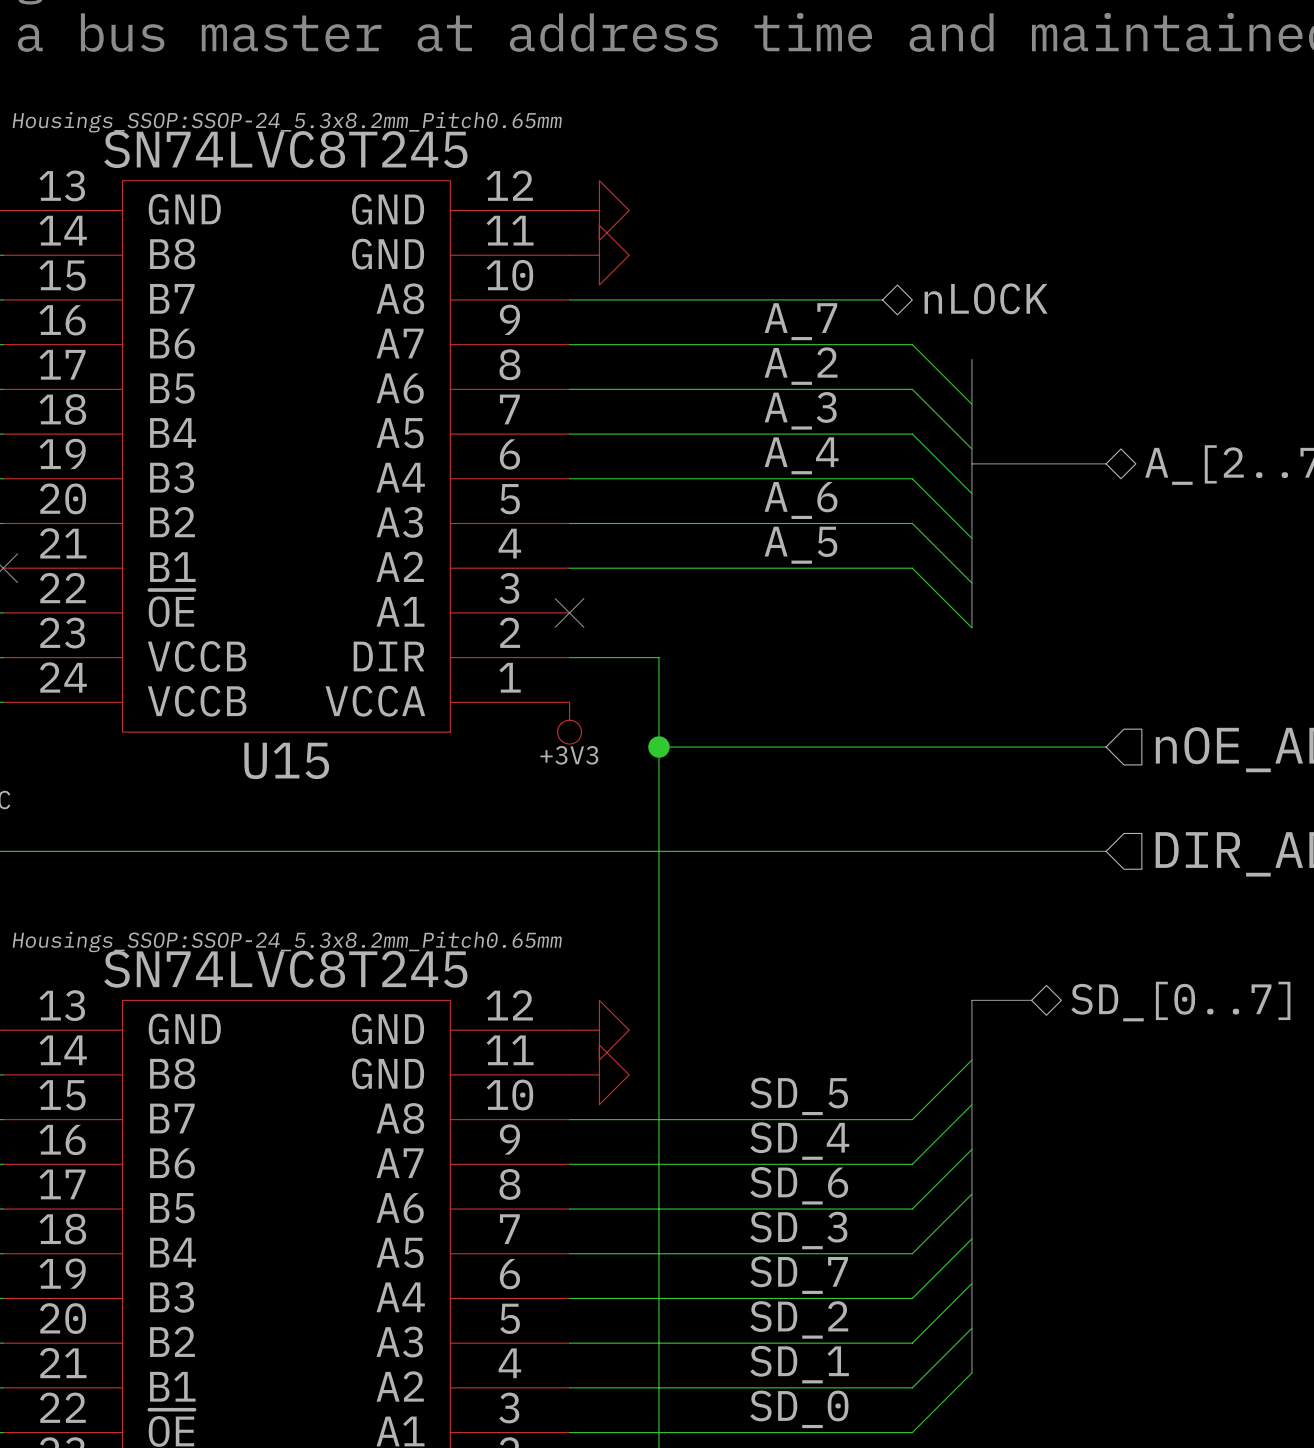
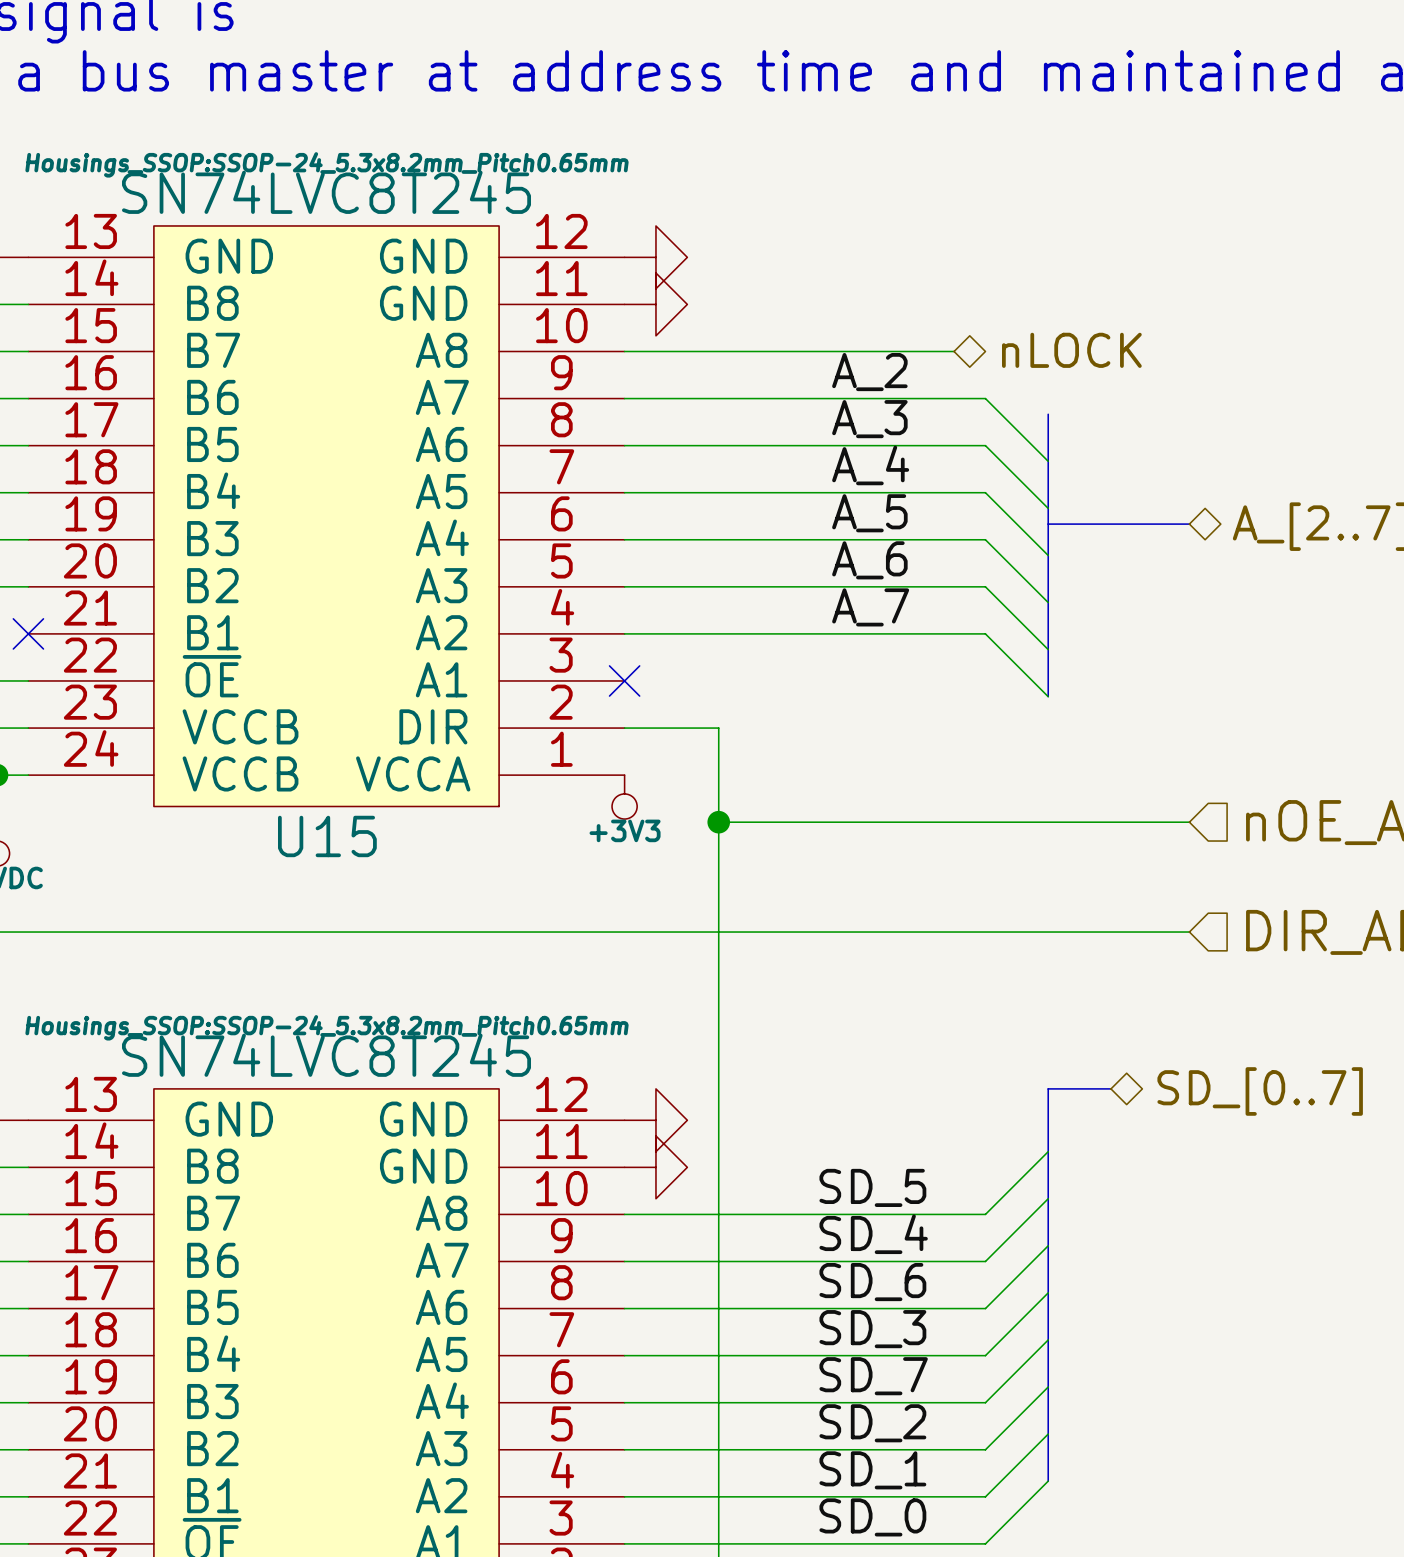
label: A_7 (800, 321) -> A_2 (869, 372)
label: A_2 (801, 366) -> A_3 (869, 419)
label: A_3 (800, 410) -> A_4 (870, 465)
label: A_4 (801, 455) -> A_5 (869, 513)
label: A_5 (800, 545) -> A_7 (870, 607)

